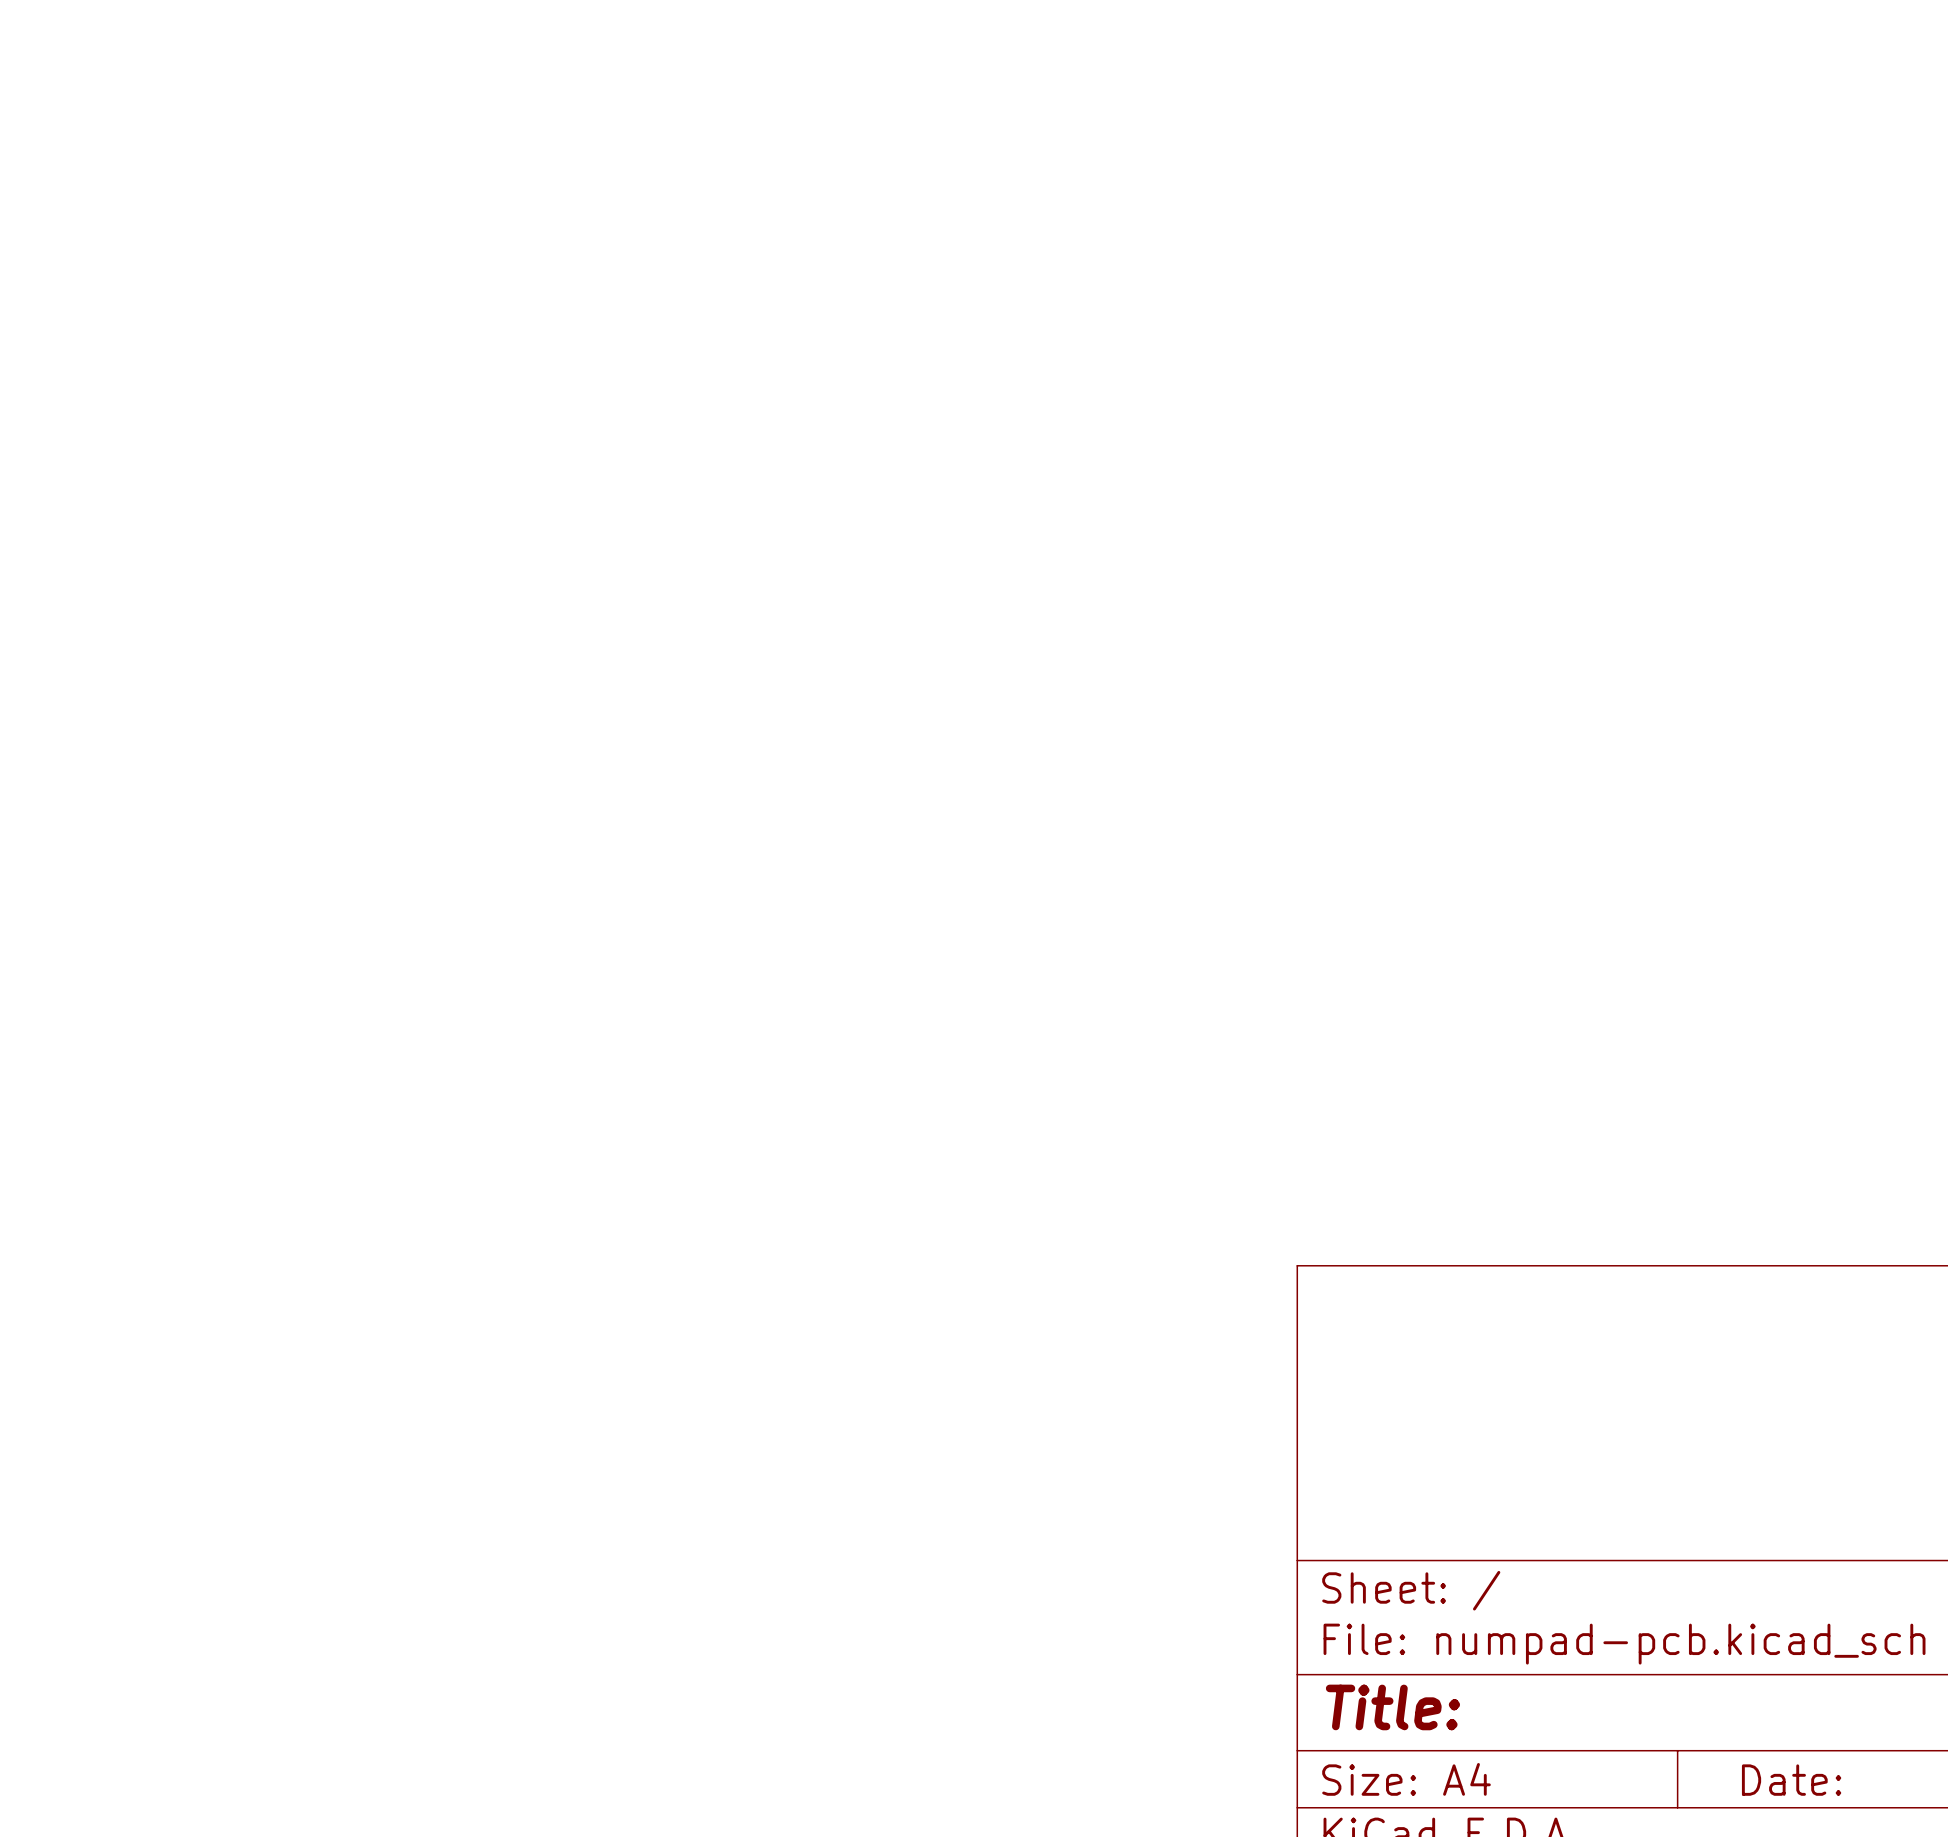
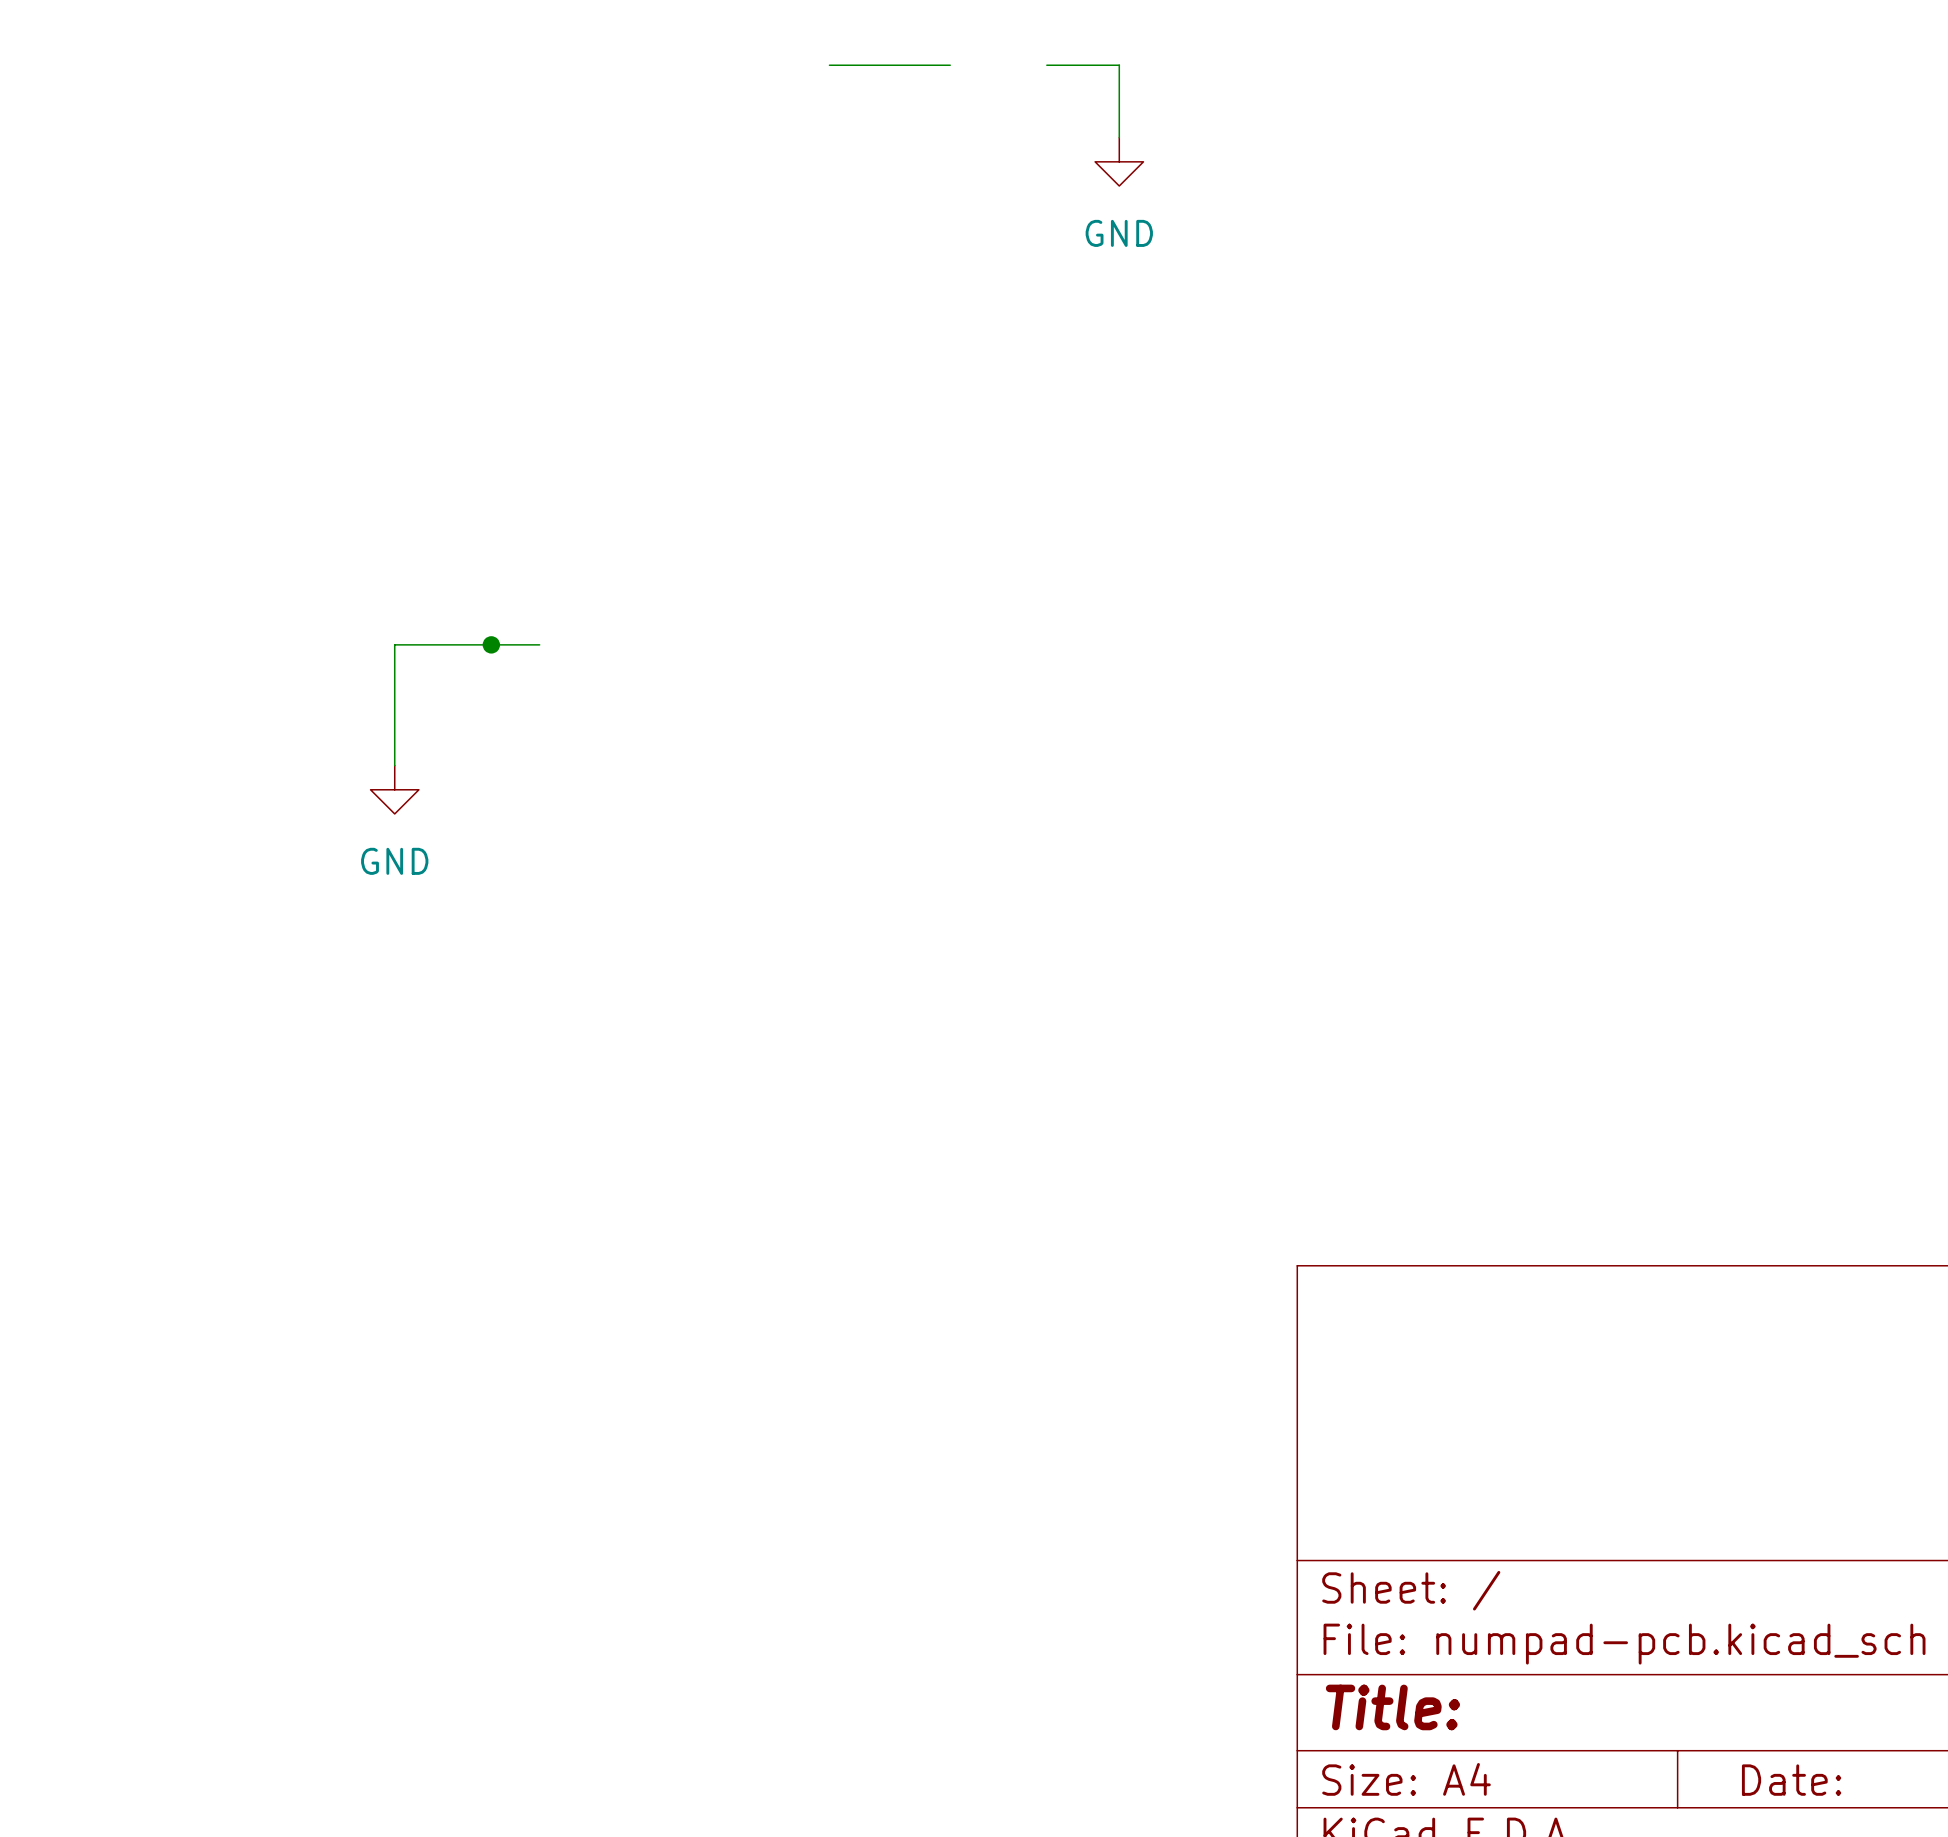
wire: none -> (829, 65) (950, 65)
wire: none -> (1046, 65) (1119, 65) (1119, 137)
power symbol: none -> GND (1119, 161)
junction: none -> (491, 644)
wire: none -> (539, 644) (394, 644) (394, 765)
power symbol: none -> GND (394, 789)

